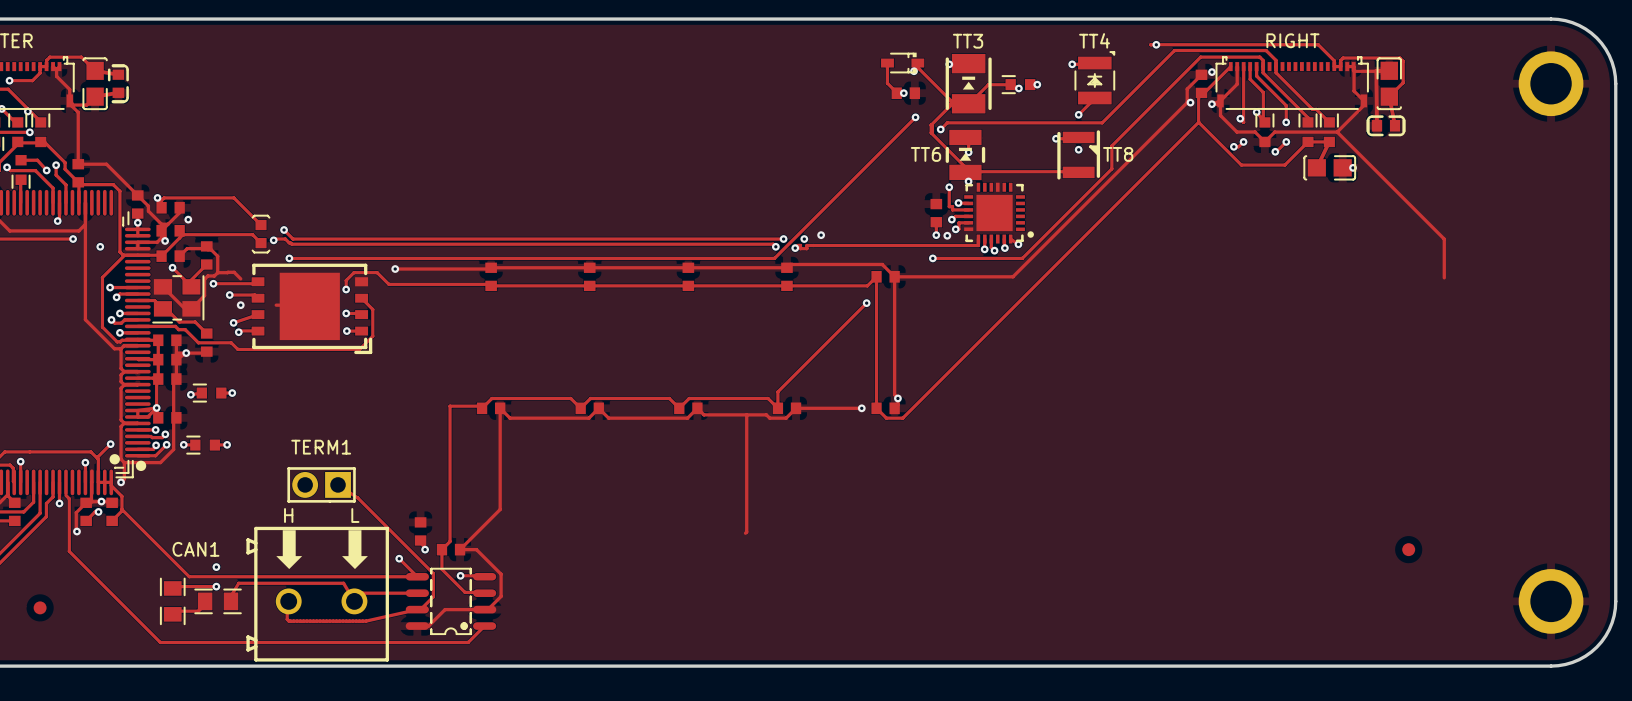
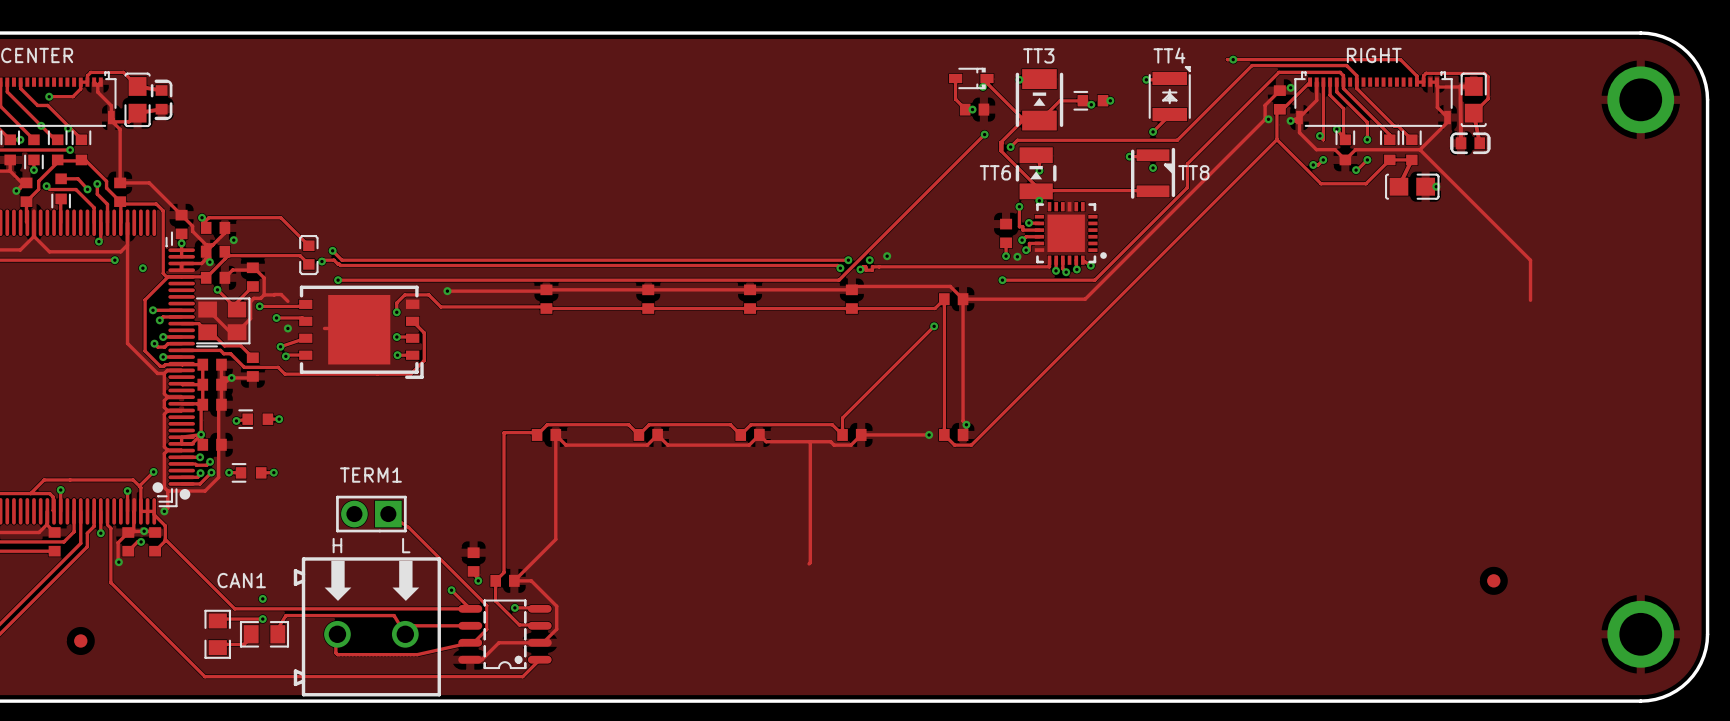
part footprint: [1074, 51, 1116, 105] -> [1148, 66, 1191, 122]
part footprint: [251, 214, 271, 254] -> [299, 235, 319, 276]
part footprint: [152, 275, 205, 324] -> [195, 297, 251, 348]
part footprint: [159, 577, 186, 626] -> [204, 609, 231, 659]
part footprint: [194, 588, 242, 615] -> [239, 621, 290, 648]

